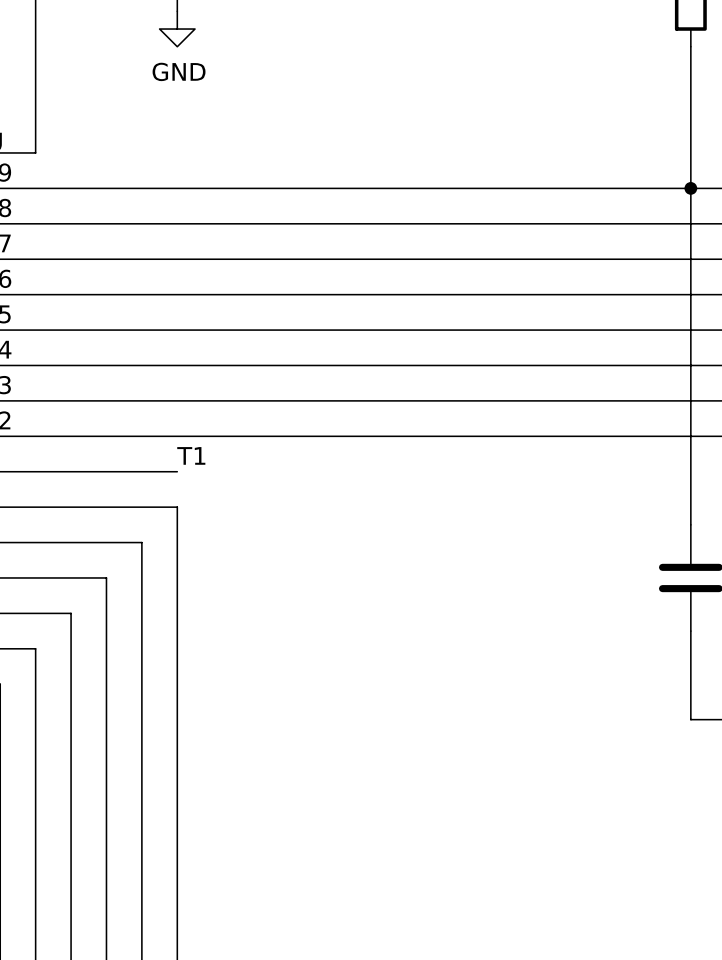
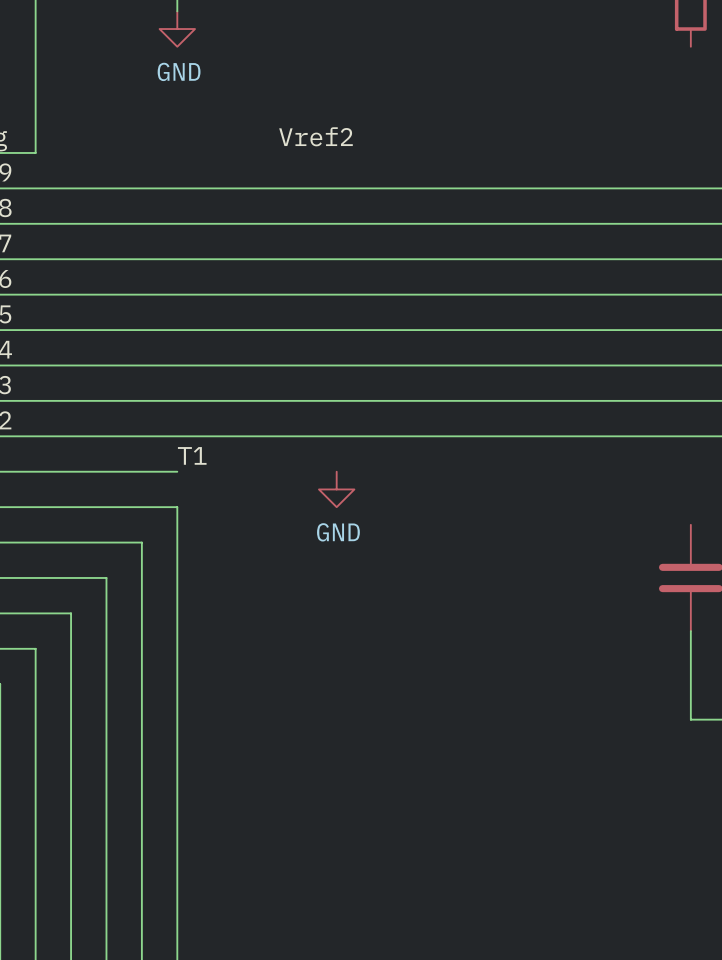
wire: (690, 46) (690, 524) -> none
label: none -> Vref2 (315, 136)
junction: (690, 188) -> none
power symbol: none -> GND (336, 489)

